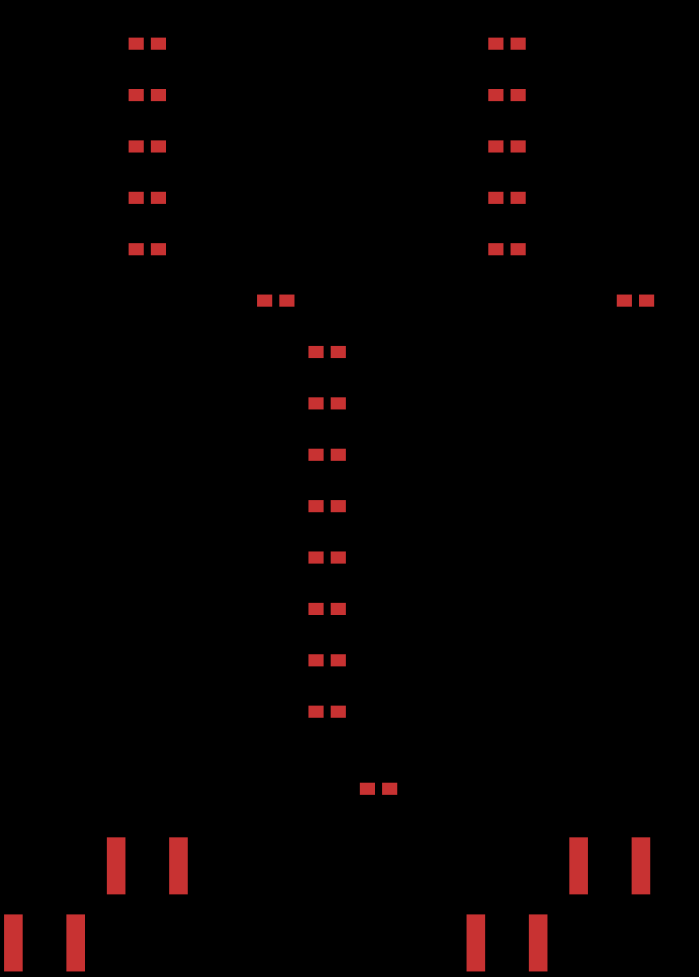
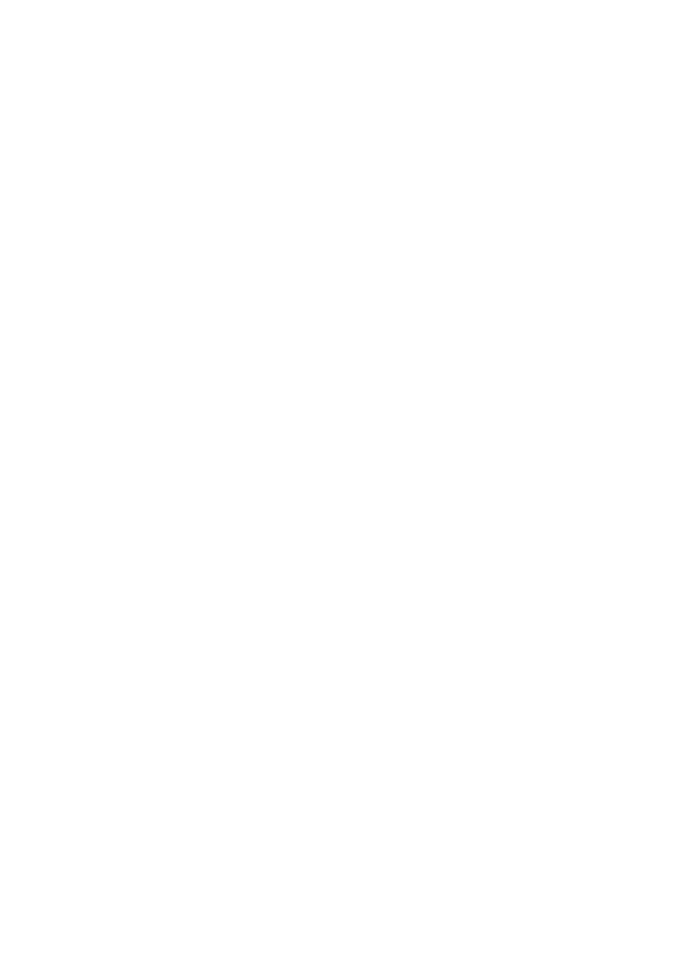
part: (147, 43) -> none
part: (507, 43) -> none
part: (147, 95) -> none
part: (507, 95) -> none
part: (147, 146) -> none
part: (507, 146) -> none
part: (147, 197) -> none
part: (507, 197) -> none
part: (147, 249) -> none
part: (507, 249) -> none
part: (275, 300) -> none
part: (635, 300) -> none
part: (327, 351) -> none
part: (327, 403) -> none
part: (327, 454) -> none
part: (327, 506) -> none
part: (327, 557) -> none
part: (327, 608) -> none
part: (327, 660) -> none
part: (327, 711) -> none
part: (378, 788) -> none
part: (147, 865) -> none
part: (609, 865) -> none
part: (44, 942) -> none
part: (507, 942) -> none

